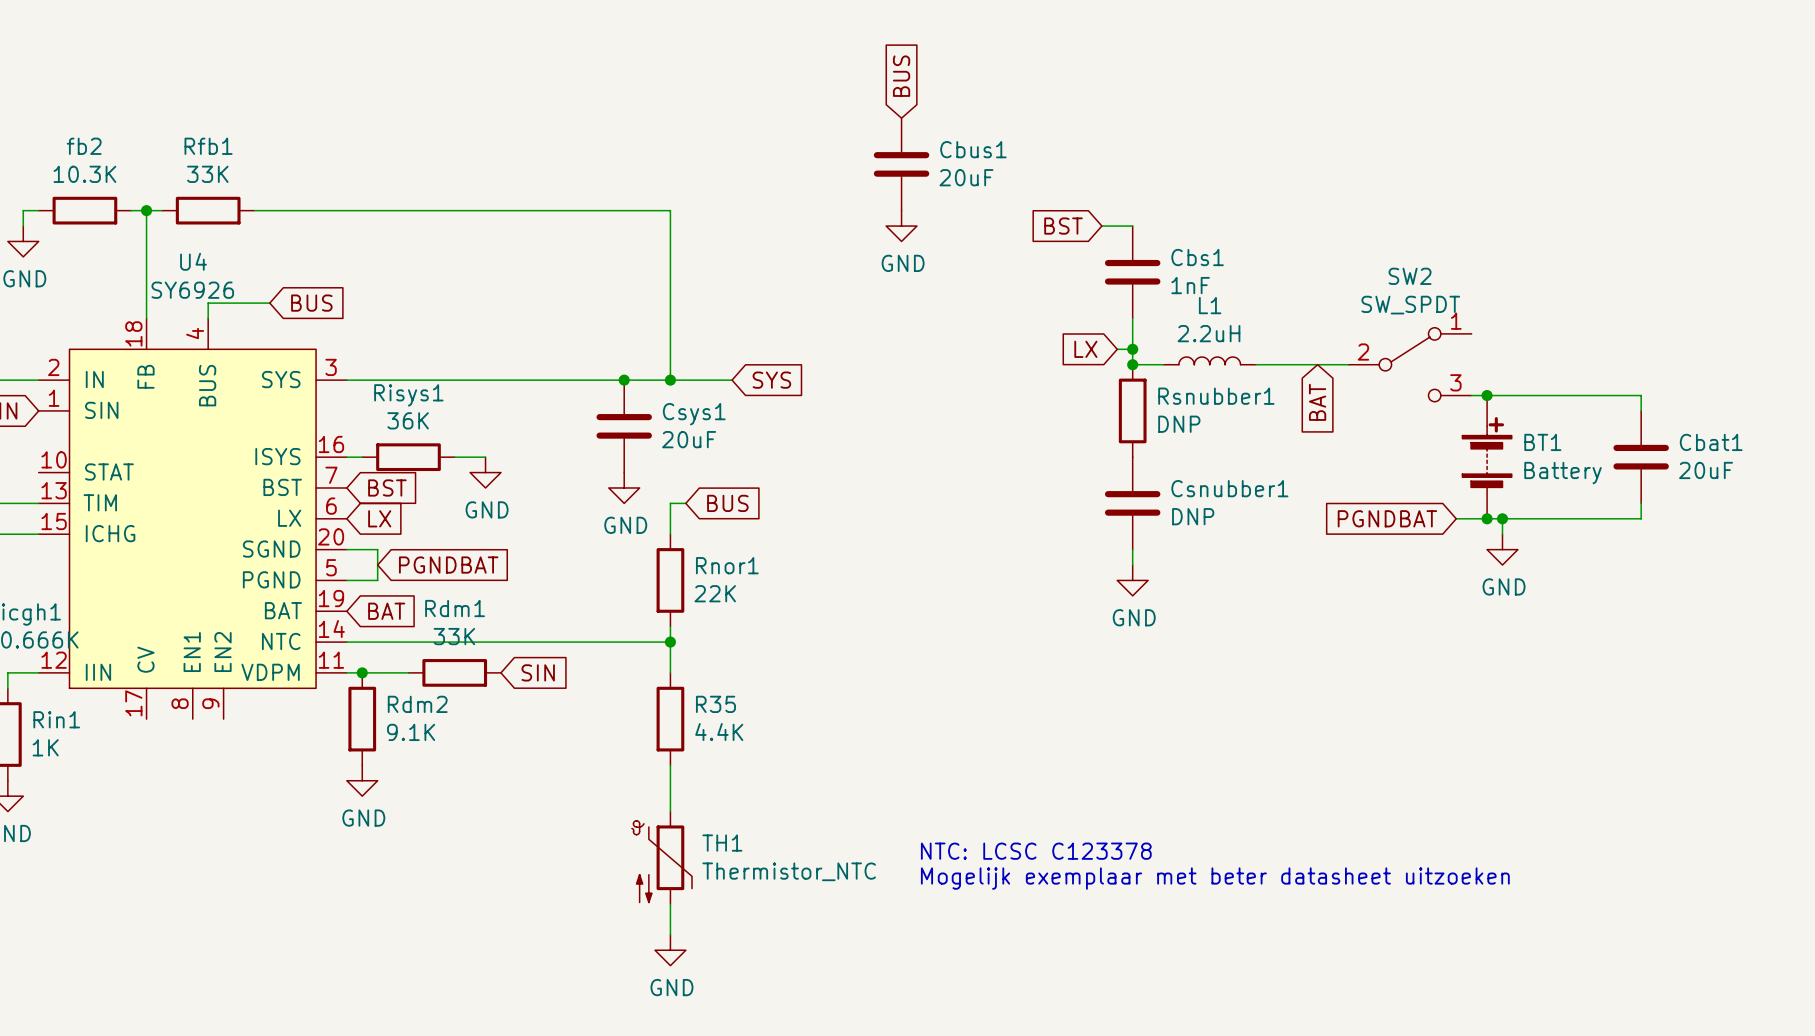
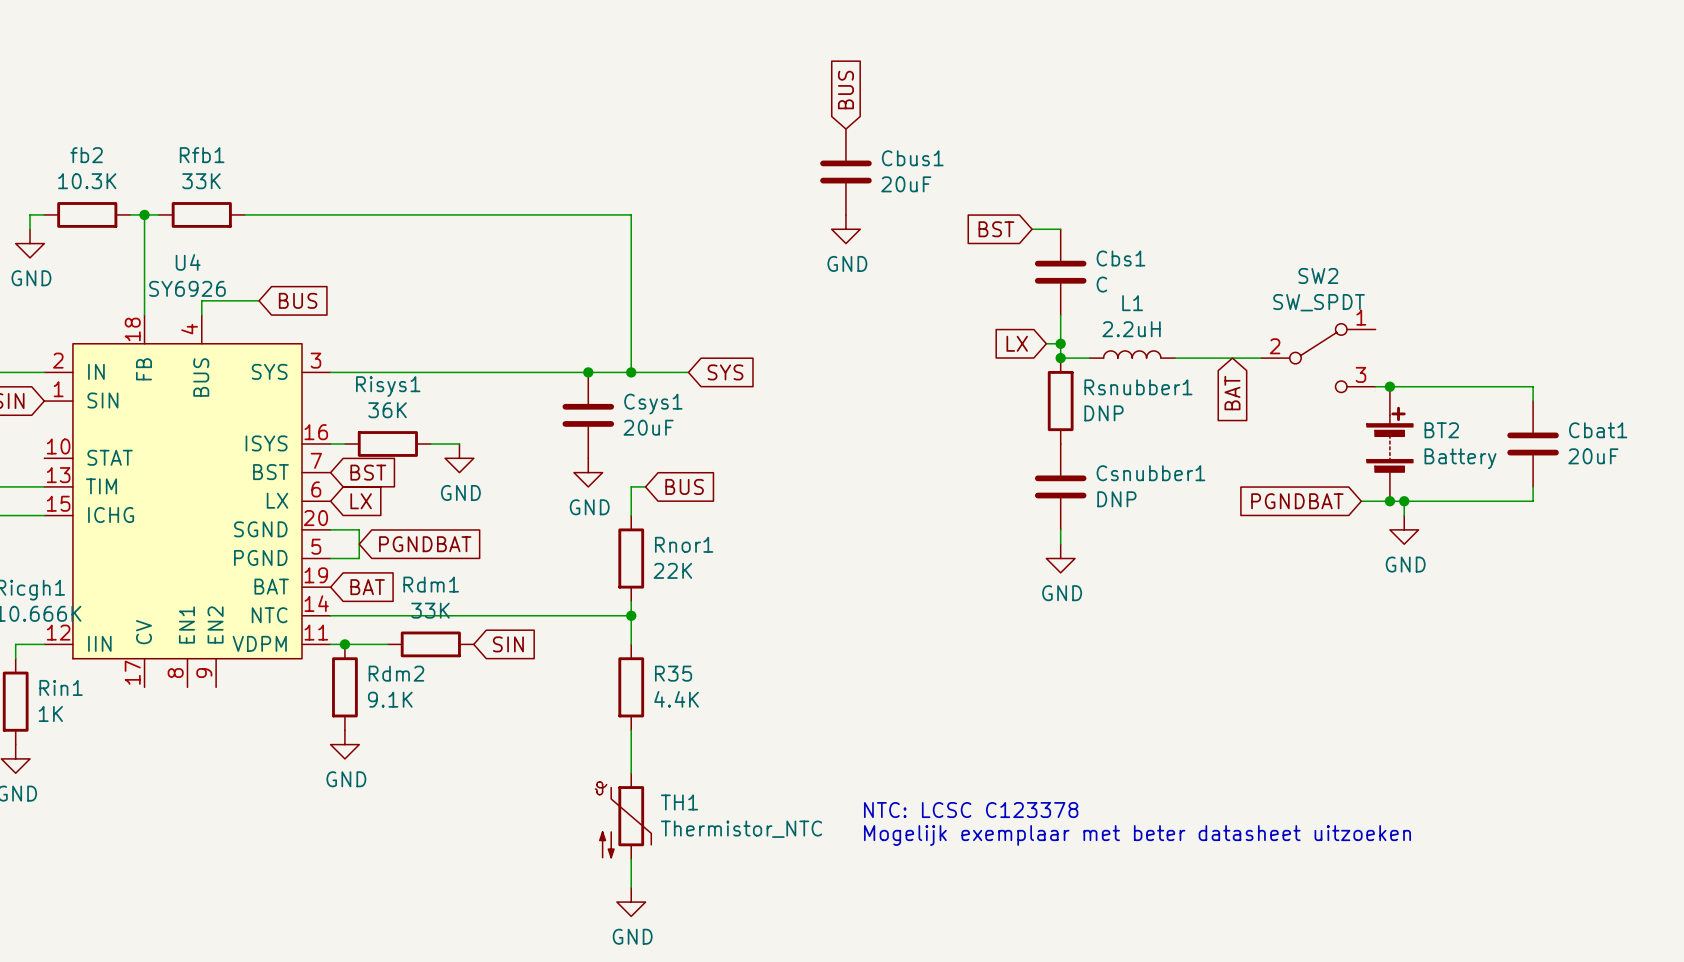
Cbs1 value: 1nF (1190, 285) -> C (1101, 284)
BT1 name: BT1 (1542, 442) -> BT2 (1441, 430)

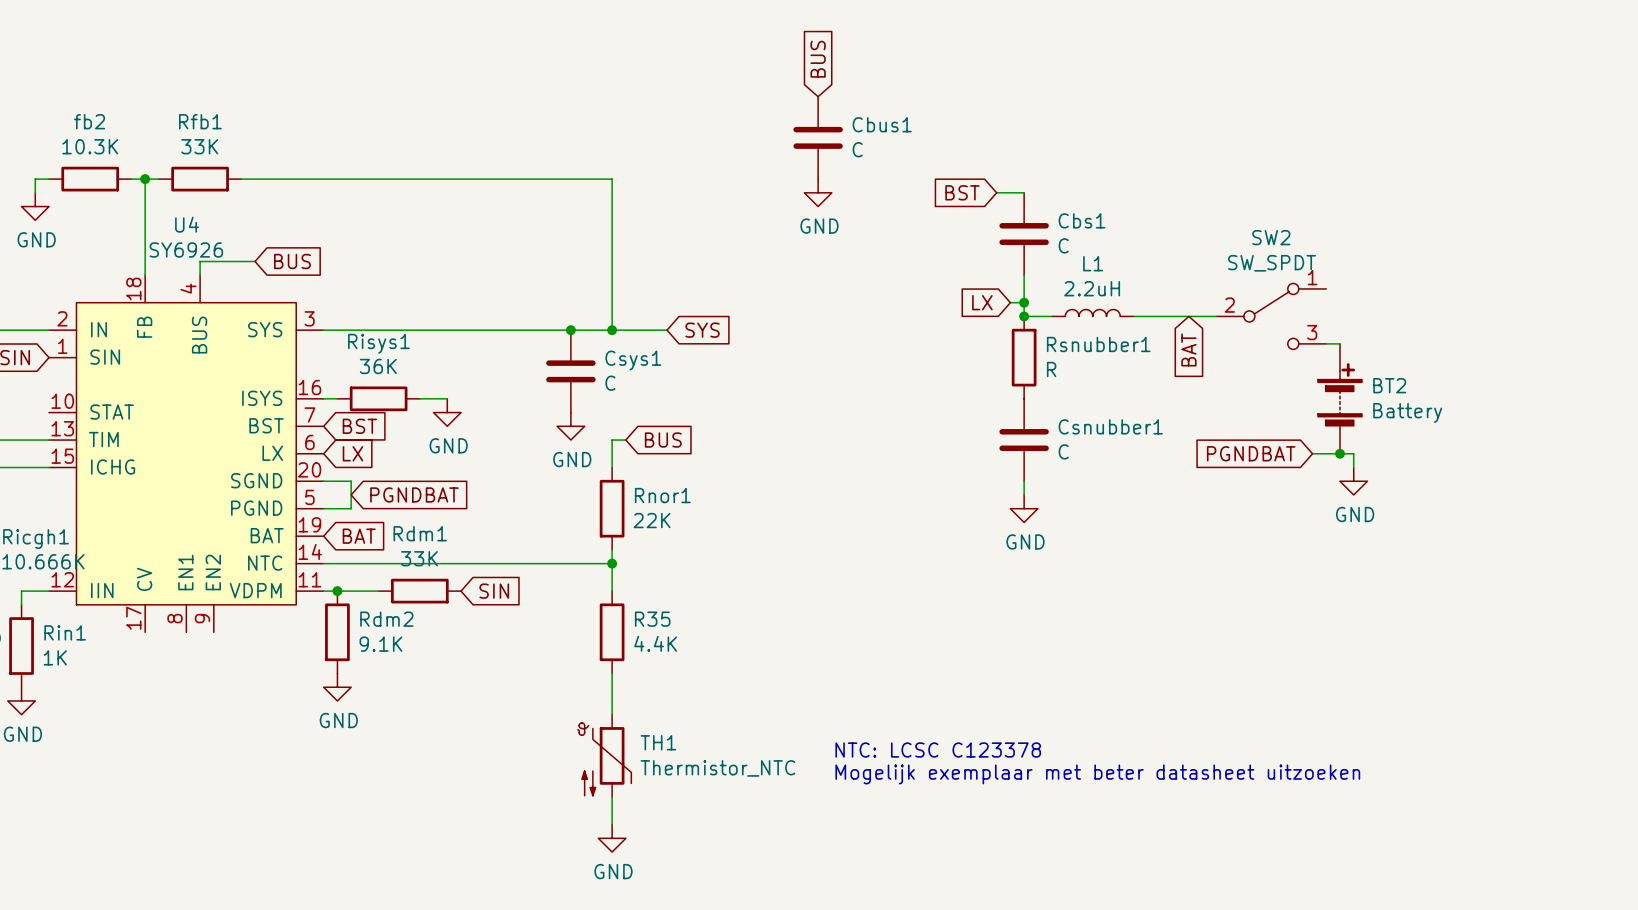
Cbus1 value: 20uF (906, 184) -> C (857, 149)
wire: (1389, 386) (1533, 386) (1533, 401) -> none
junction: (1389, 386) -> none
Rsnubber1 value: DNP (1104, 413) -> R (1051, 369)
Csys1 value: 20uF (648, 427) -> C (610, 383)
Cbat1: 20uF (1533, 443) -> none
wire: (1533, 486) (1533, 501) (1404, 501) -> none
Csnubber1 value: DNP (1116, 499) -> C (1063, 451)
junction: (1404, 501) -> none

